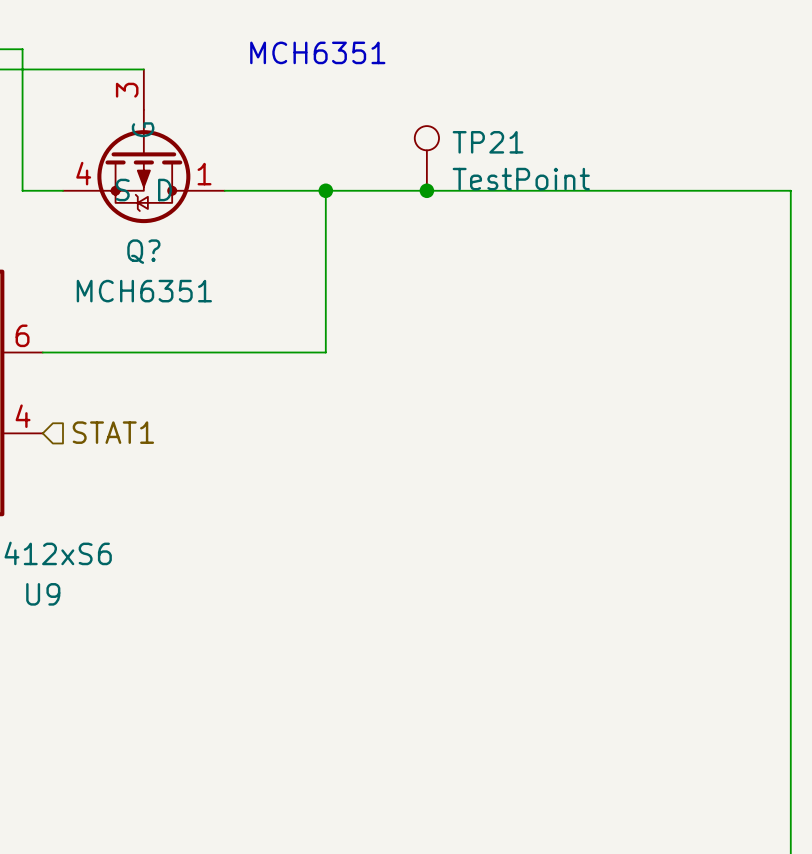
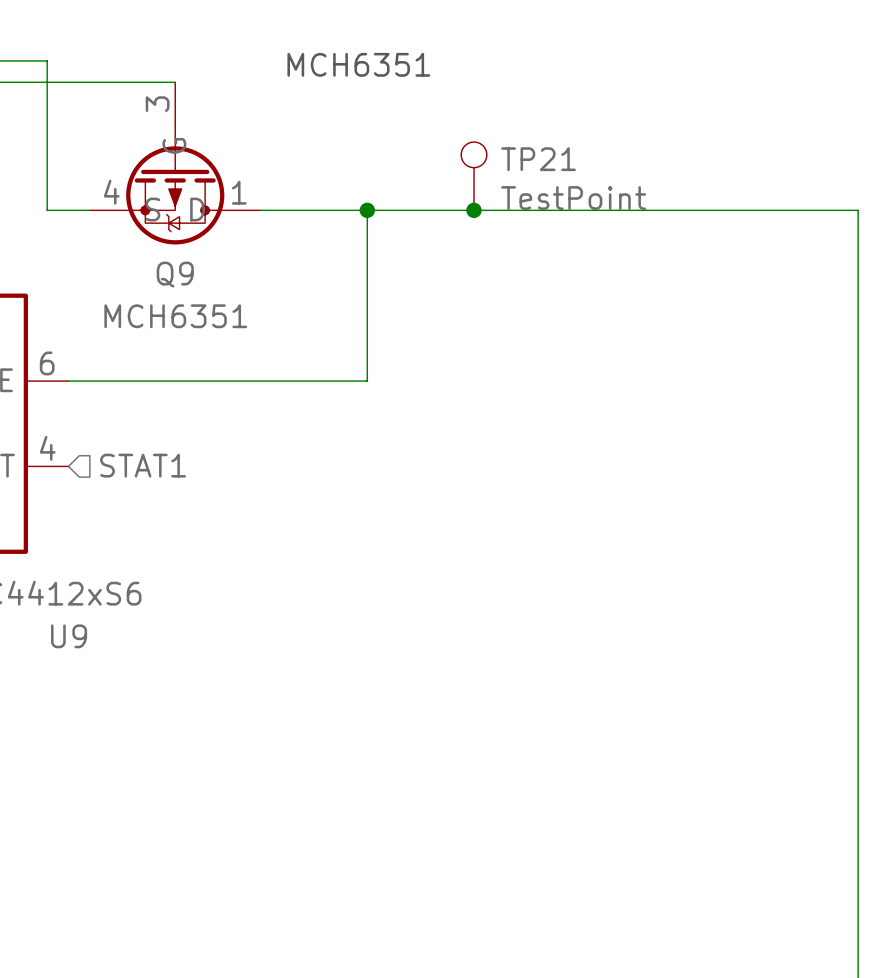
Q? name: Q? (143, 251) -> Q9 (175, 274)

